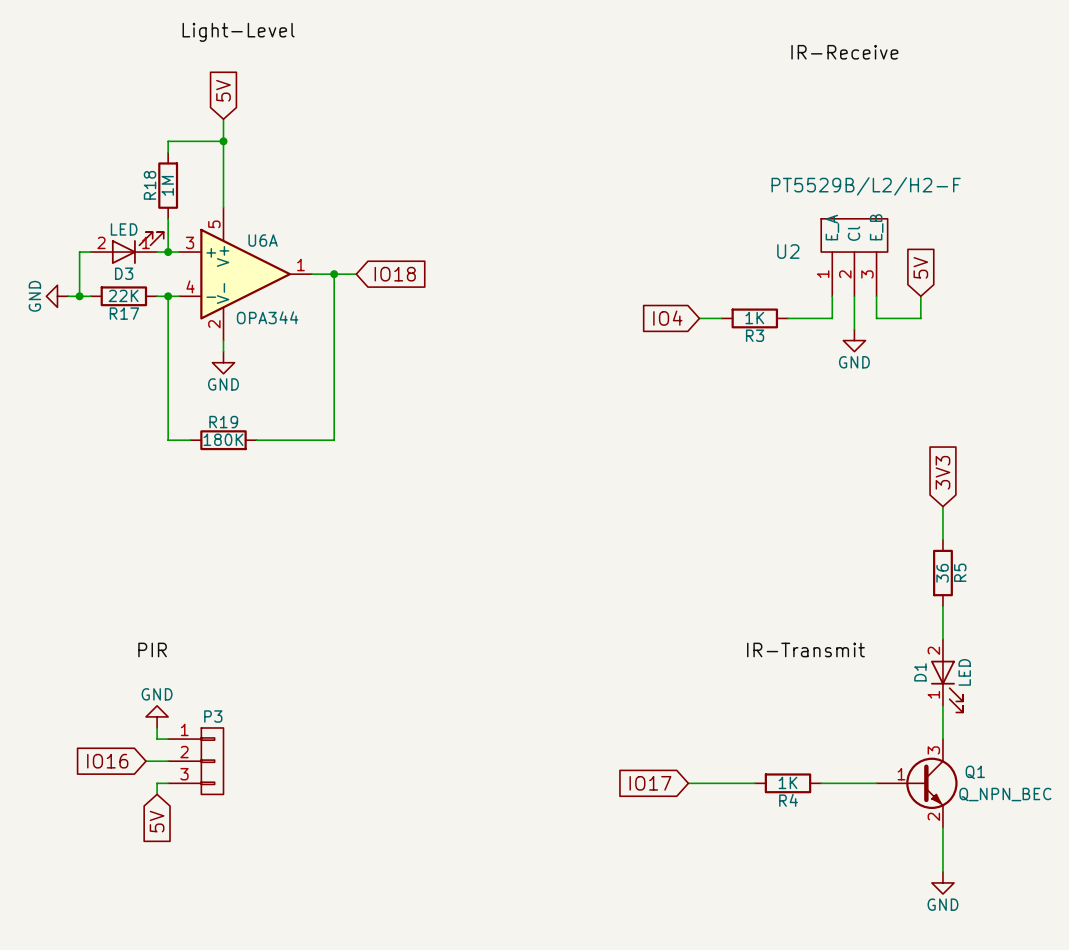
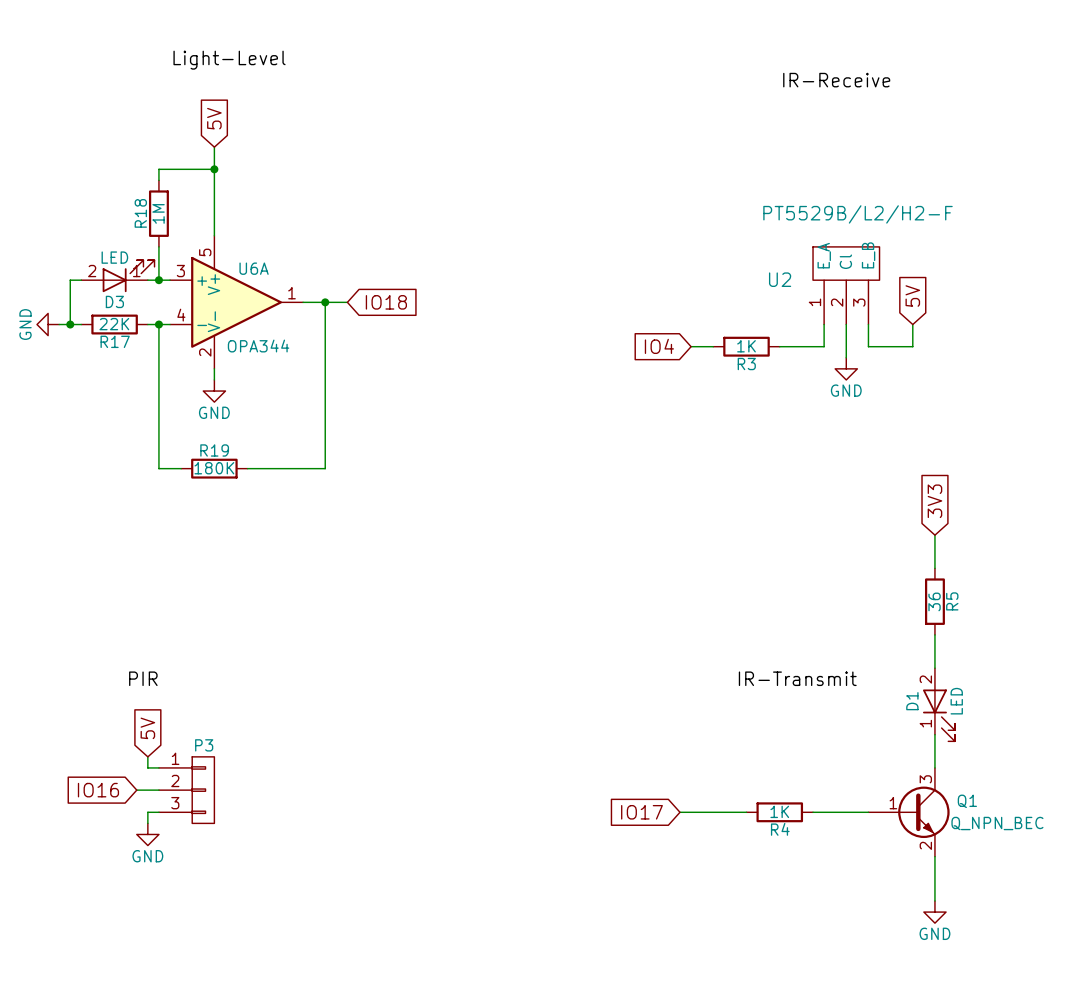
power symbol rotation: 0° (157, 716) -> 180° (147, 834)
power symbol position: GND (157, 716) -> GND (147, 834)
global label rotation: 0° (157, 821) -> 180° (147, 728)
global label position: 5V (157, 821) -> 5V (147, 728)

